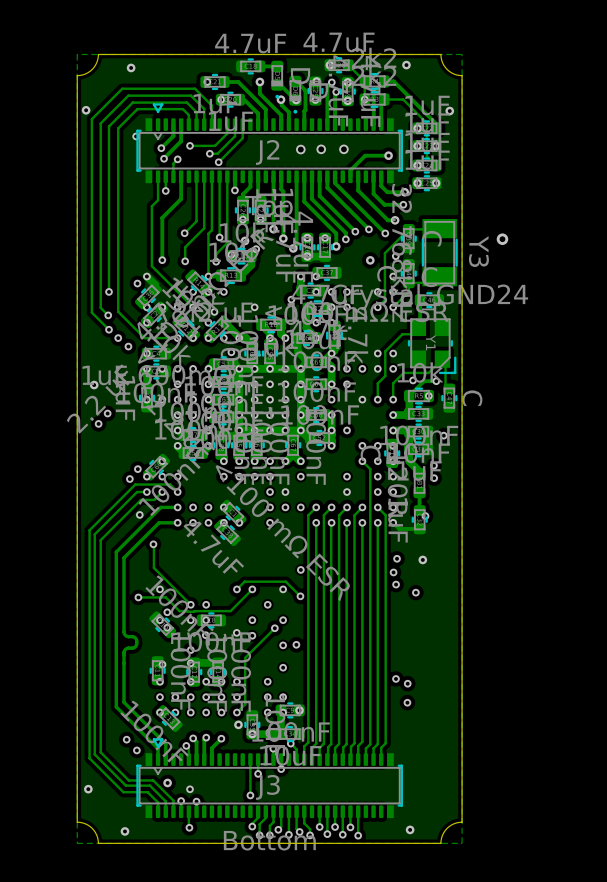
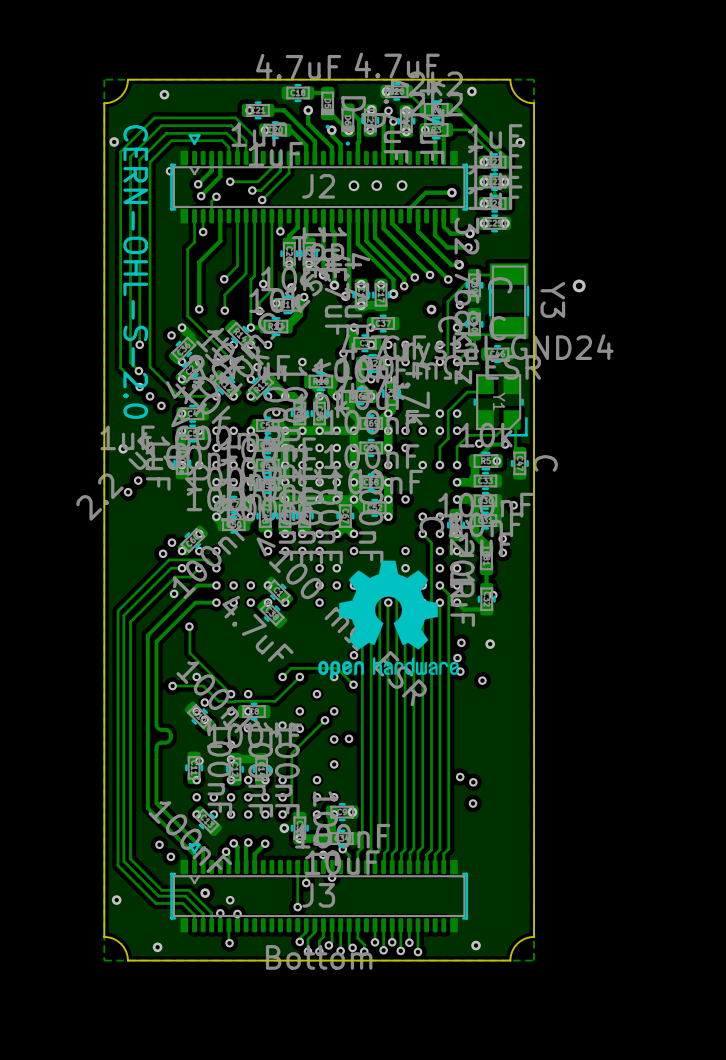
text: none -> CERN-OHL-S-2.0 (135, 271)
drawing: none -> [318, 560, 459, 680]

